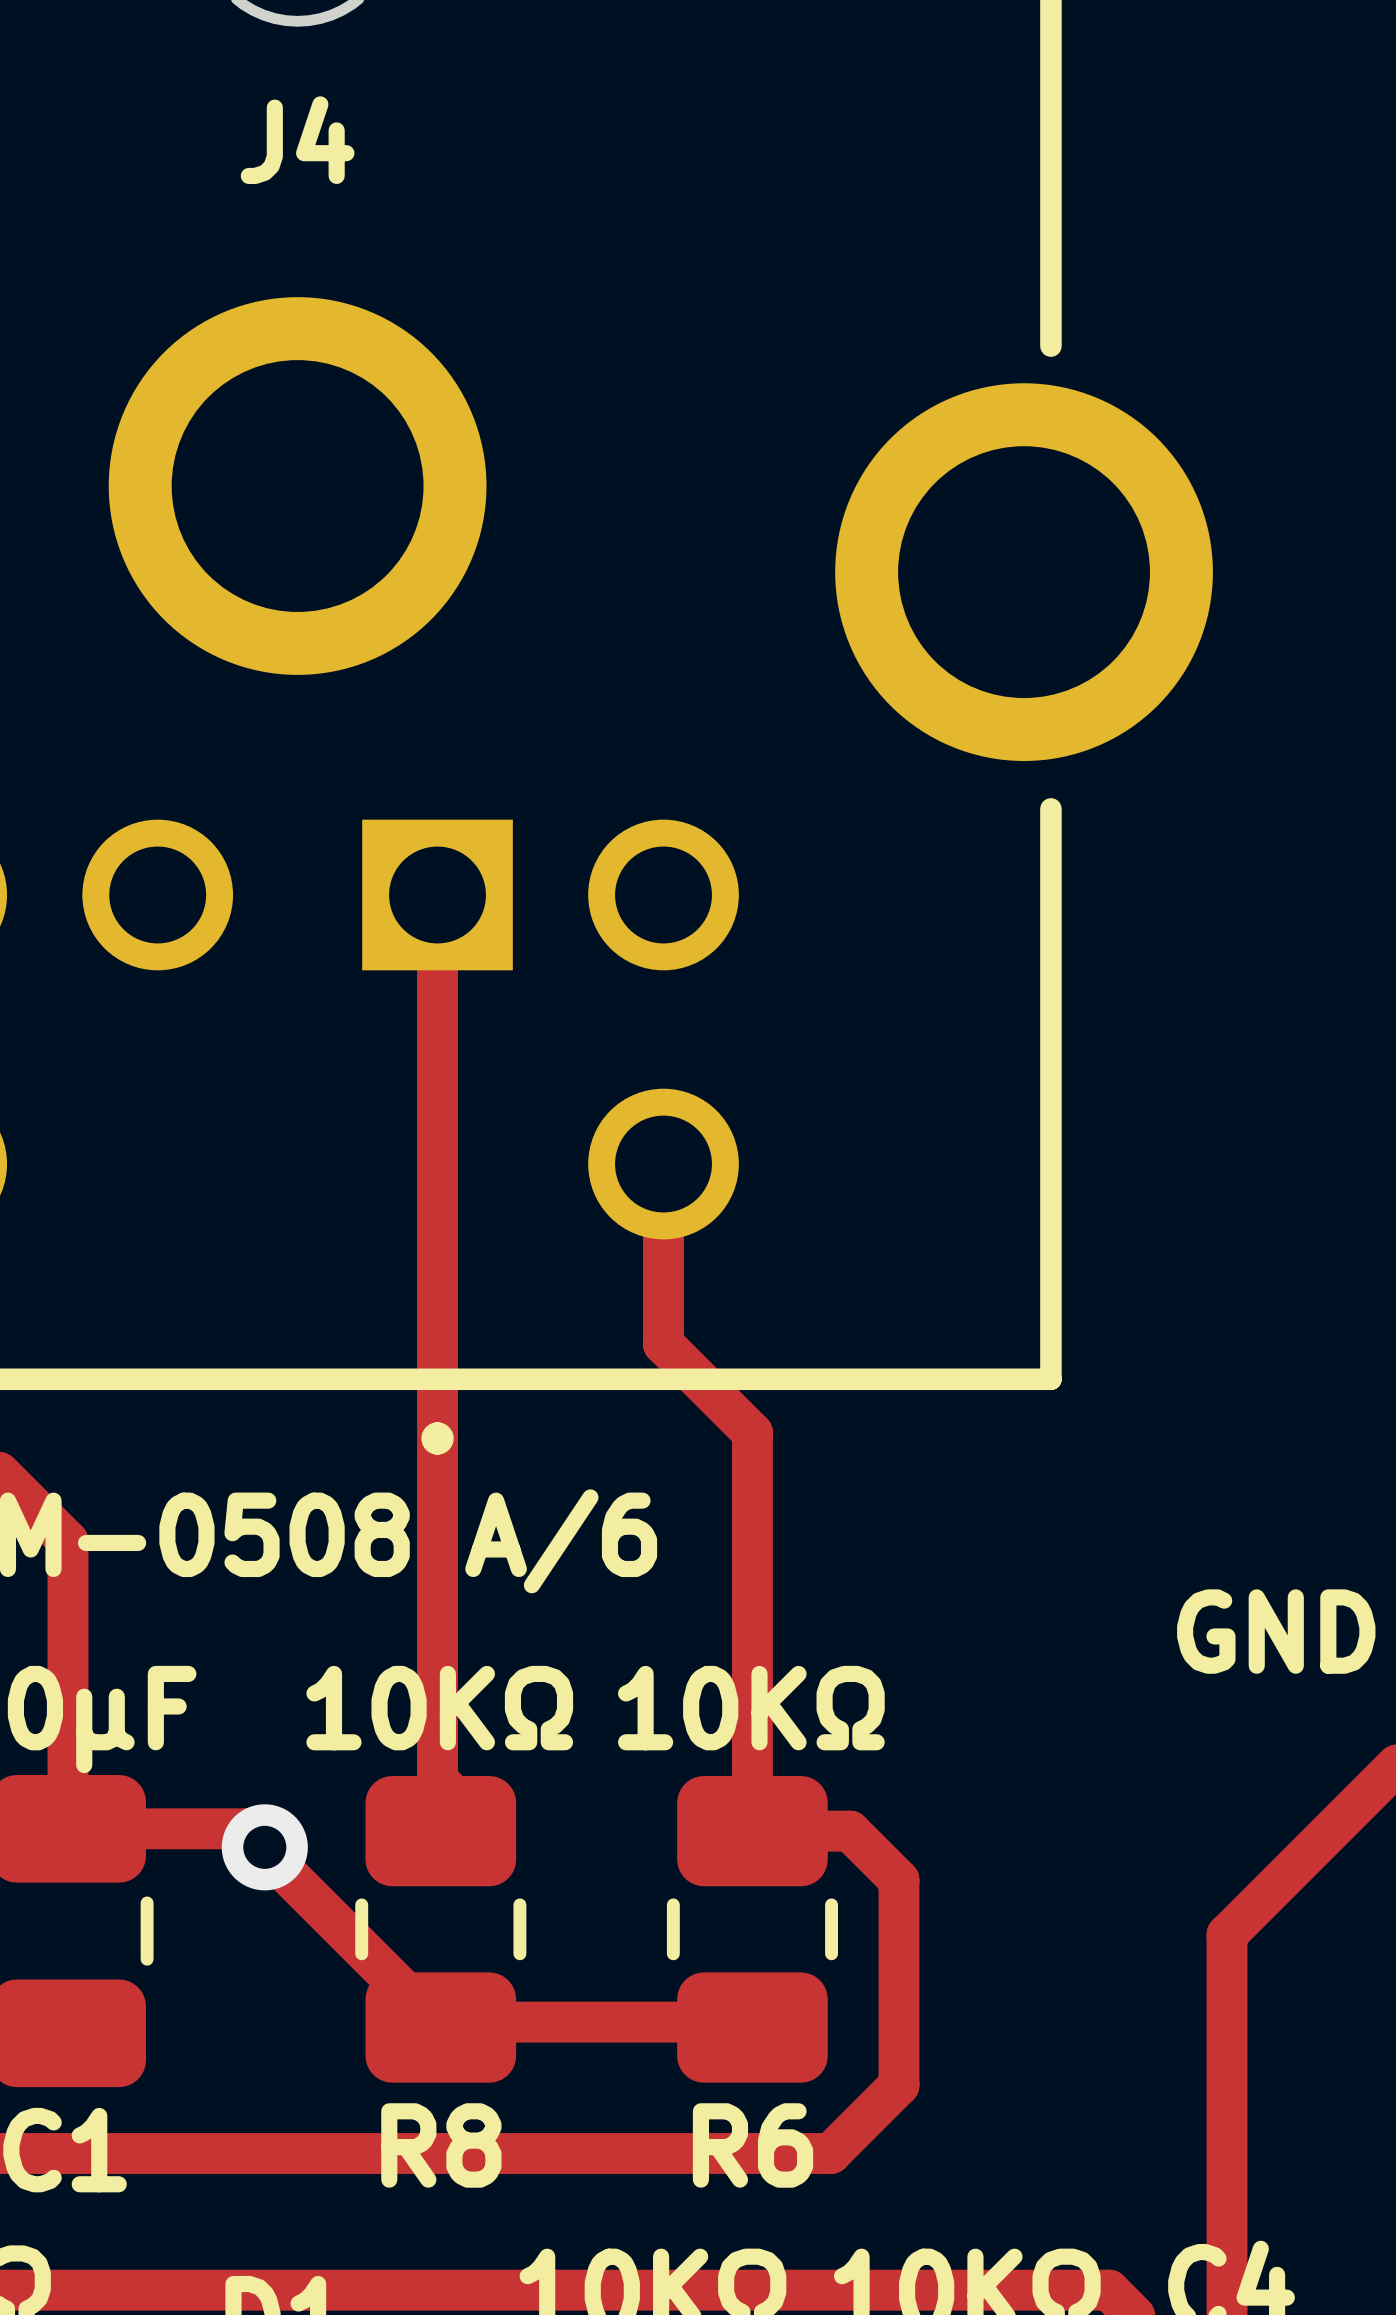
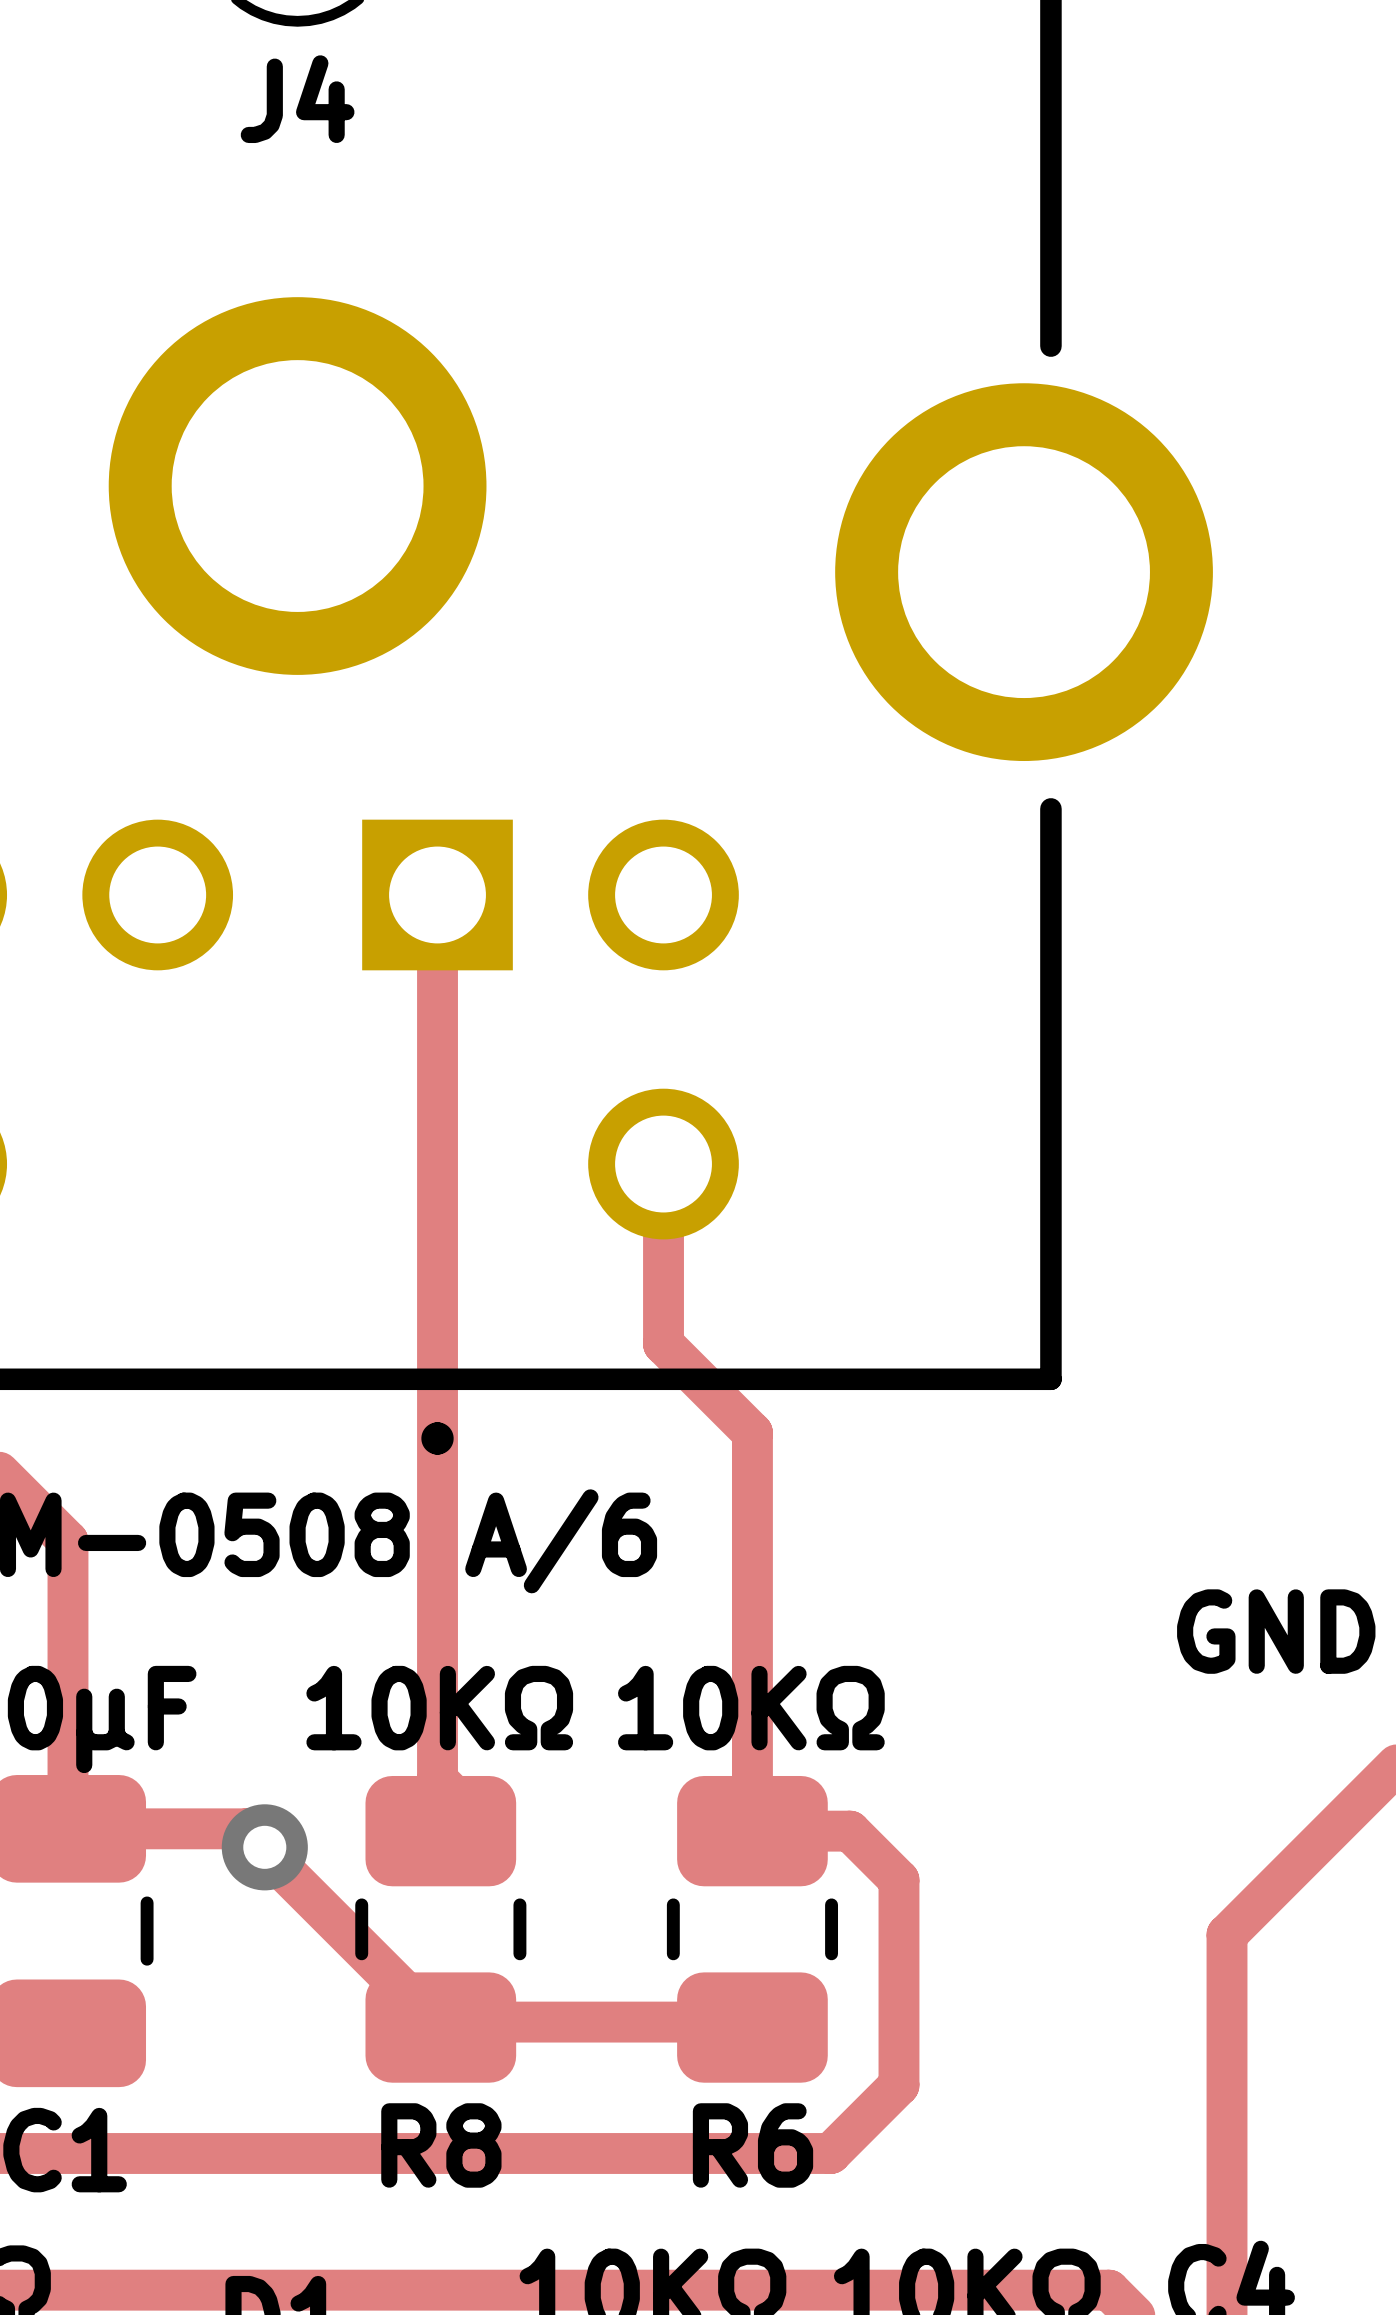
J4 name position: J4 (297, 140) -> J4 (297, 99)

